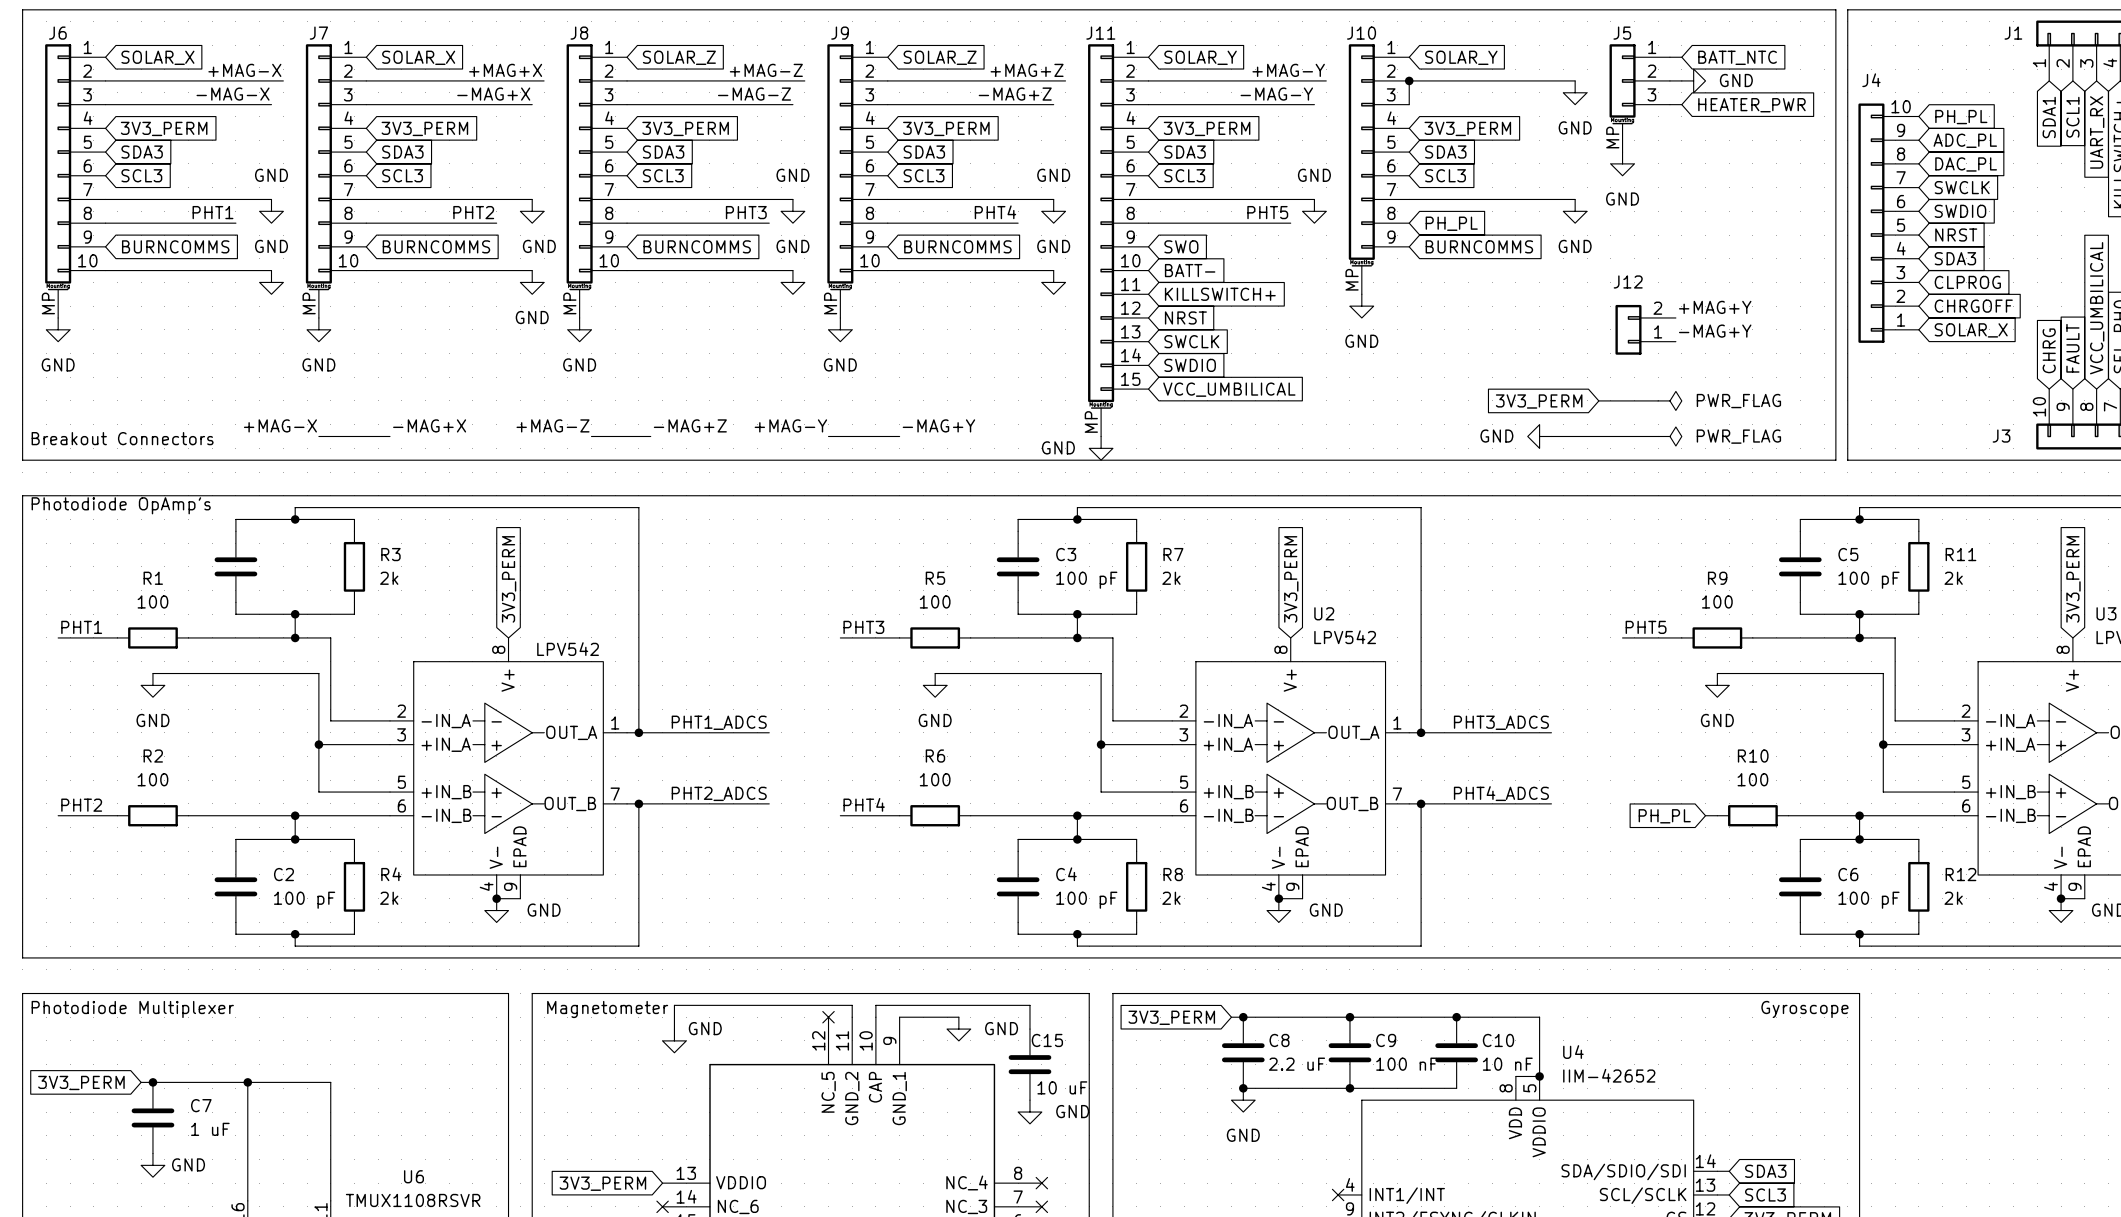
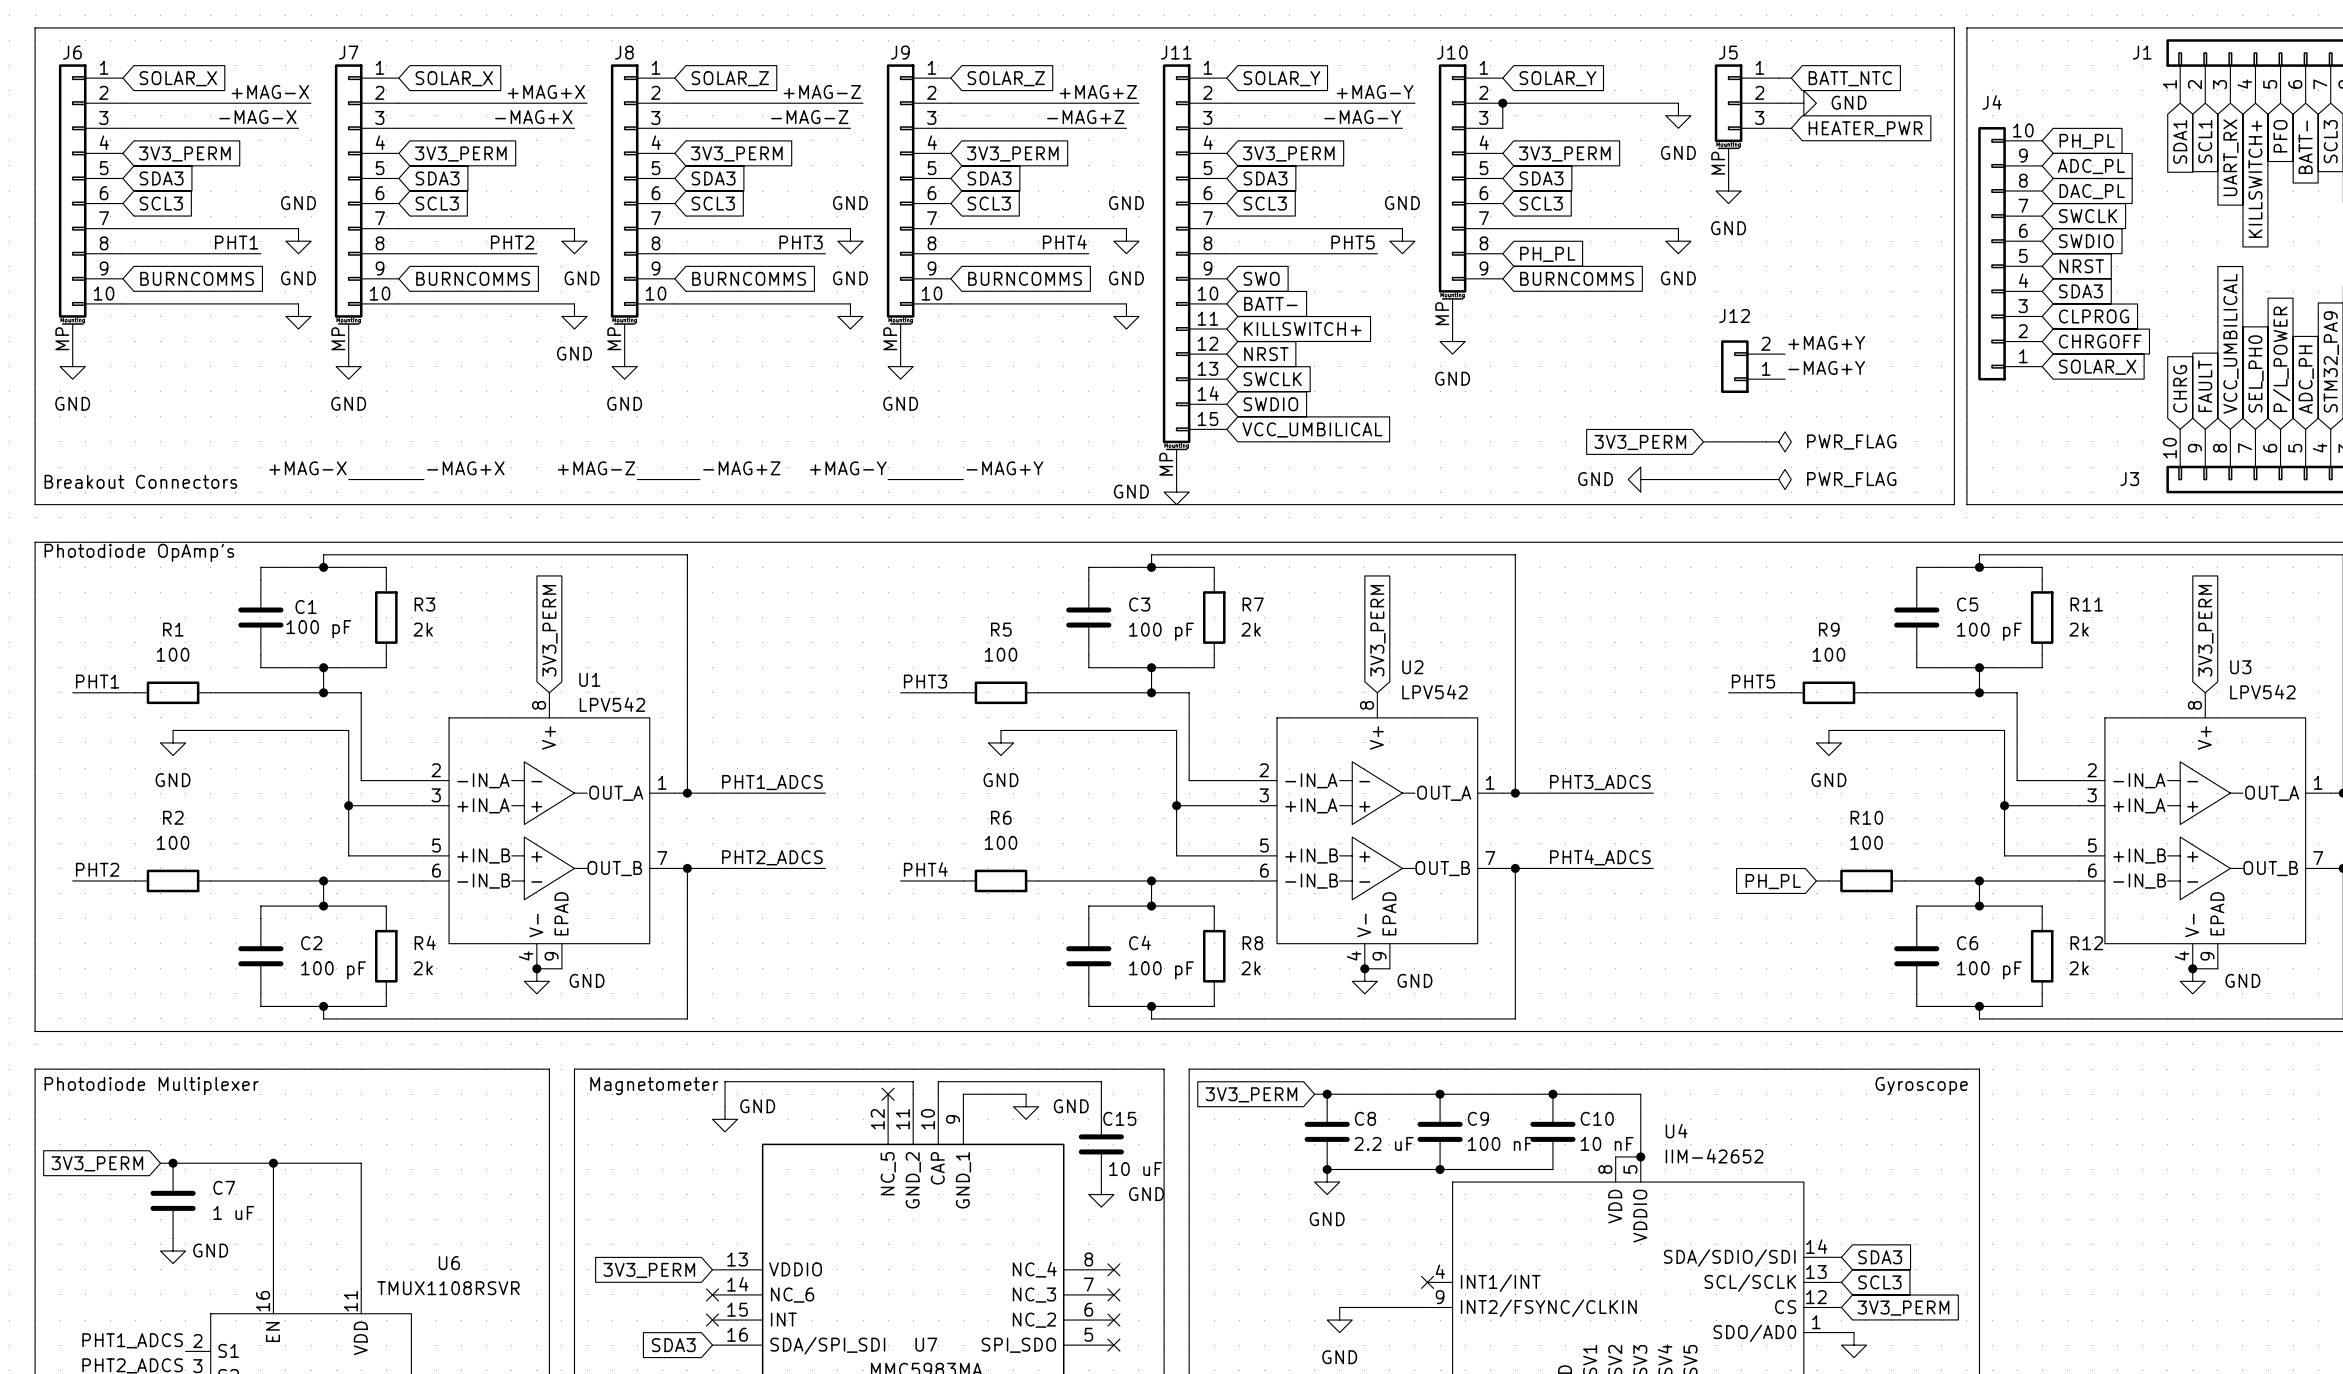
C1 name: none -> C1 (306, 607)
C1 value: none -> 100 pF (318, 629)
U1 name: none -> U1 (589, 679)

